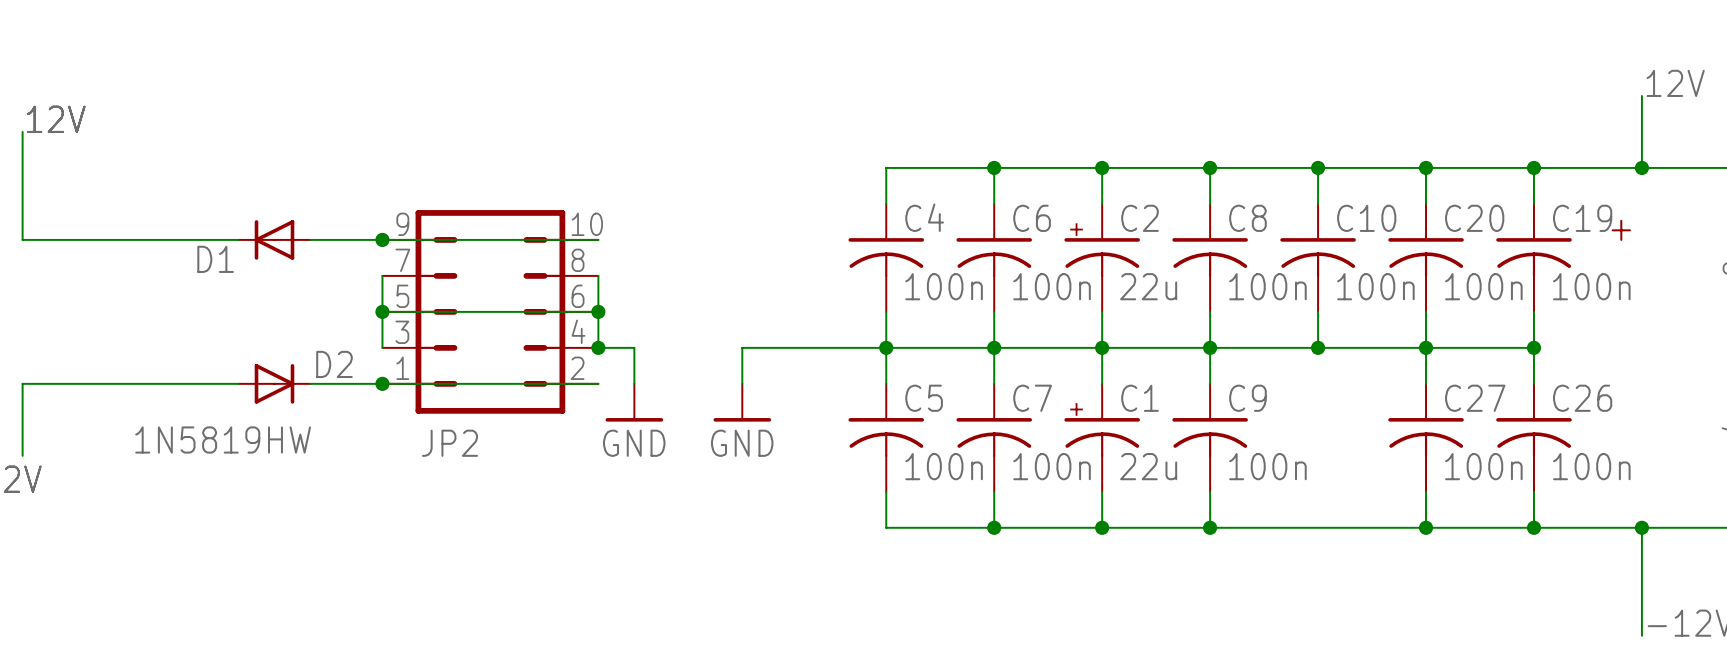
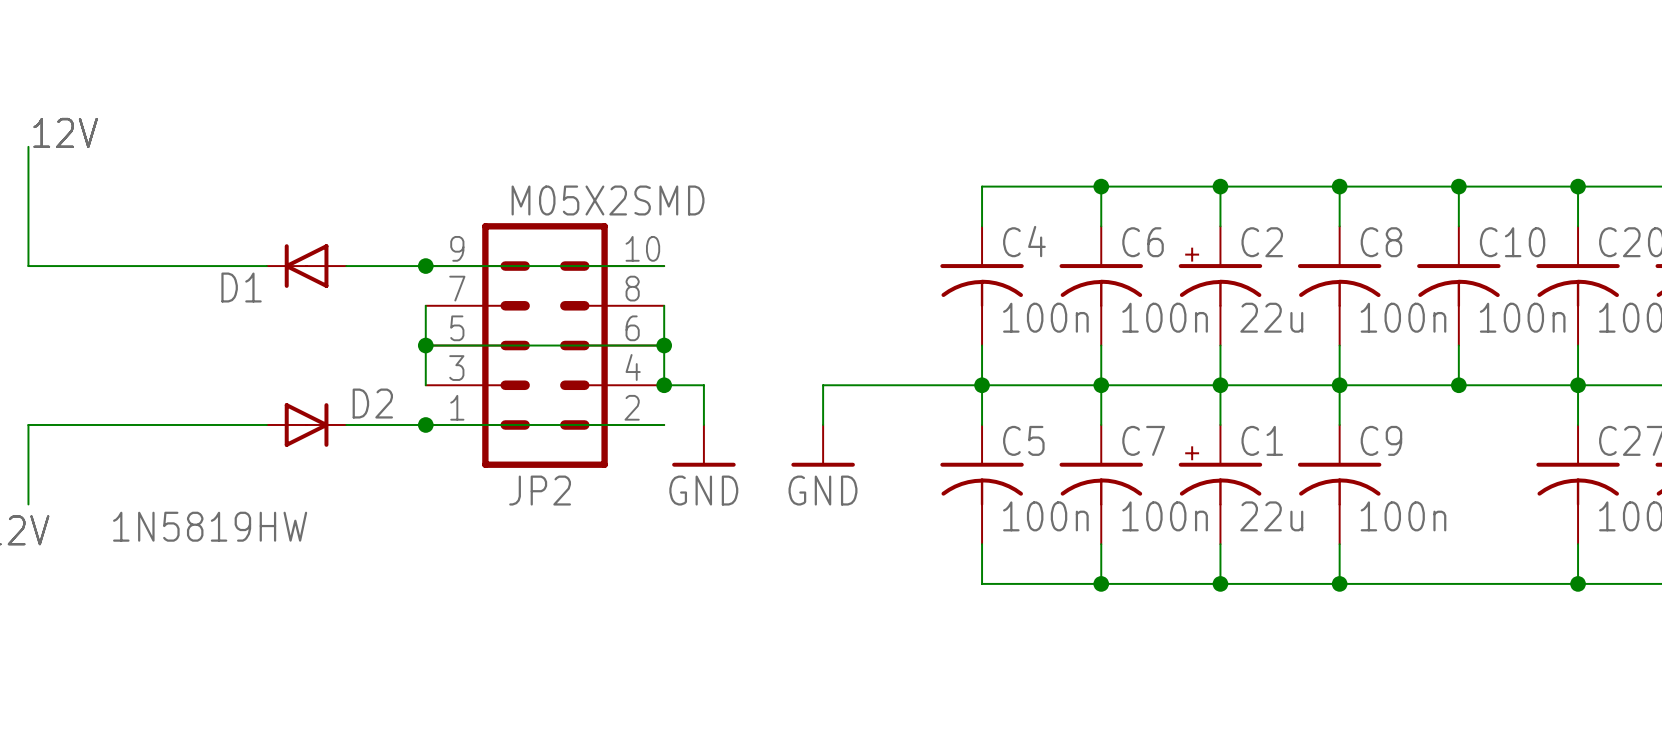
JP2 value: none -> M05X2SMD (608, 200)
JP2 symbol: [382, 210, 599, 414] -> [425, 223, 665, 468]
D2 value position: 1N5819HW (223, 440) -> 1N5819HW (210, 526)
JP2 name position: JP2 (450, 443) -> JP2 (540, 490)

